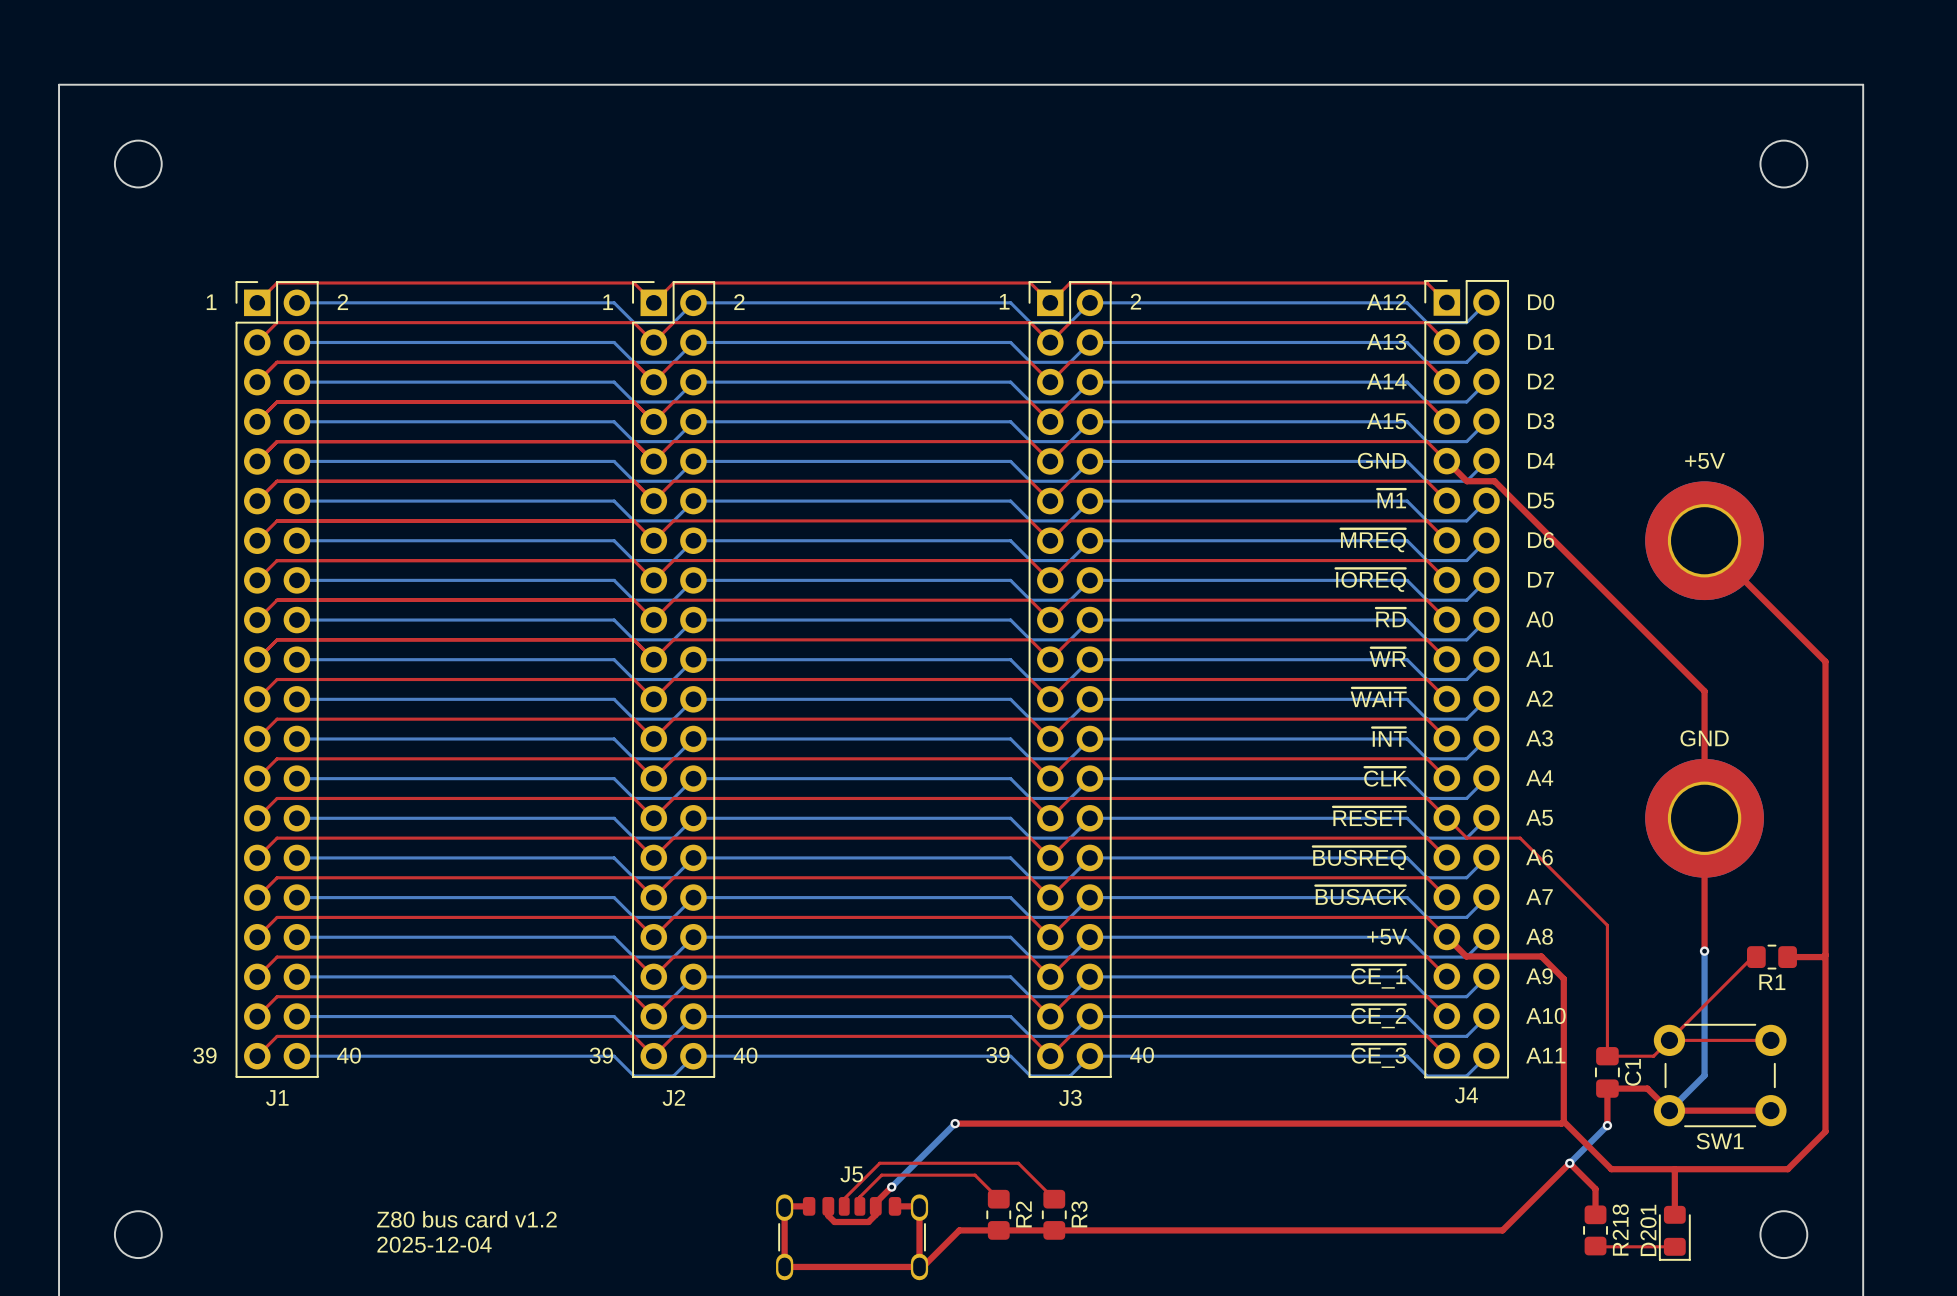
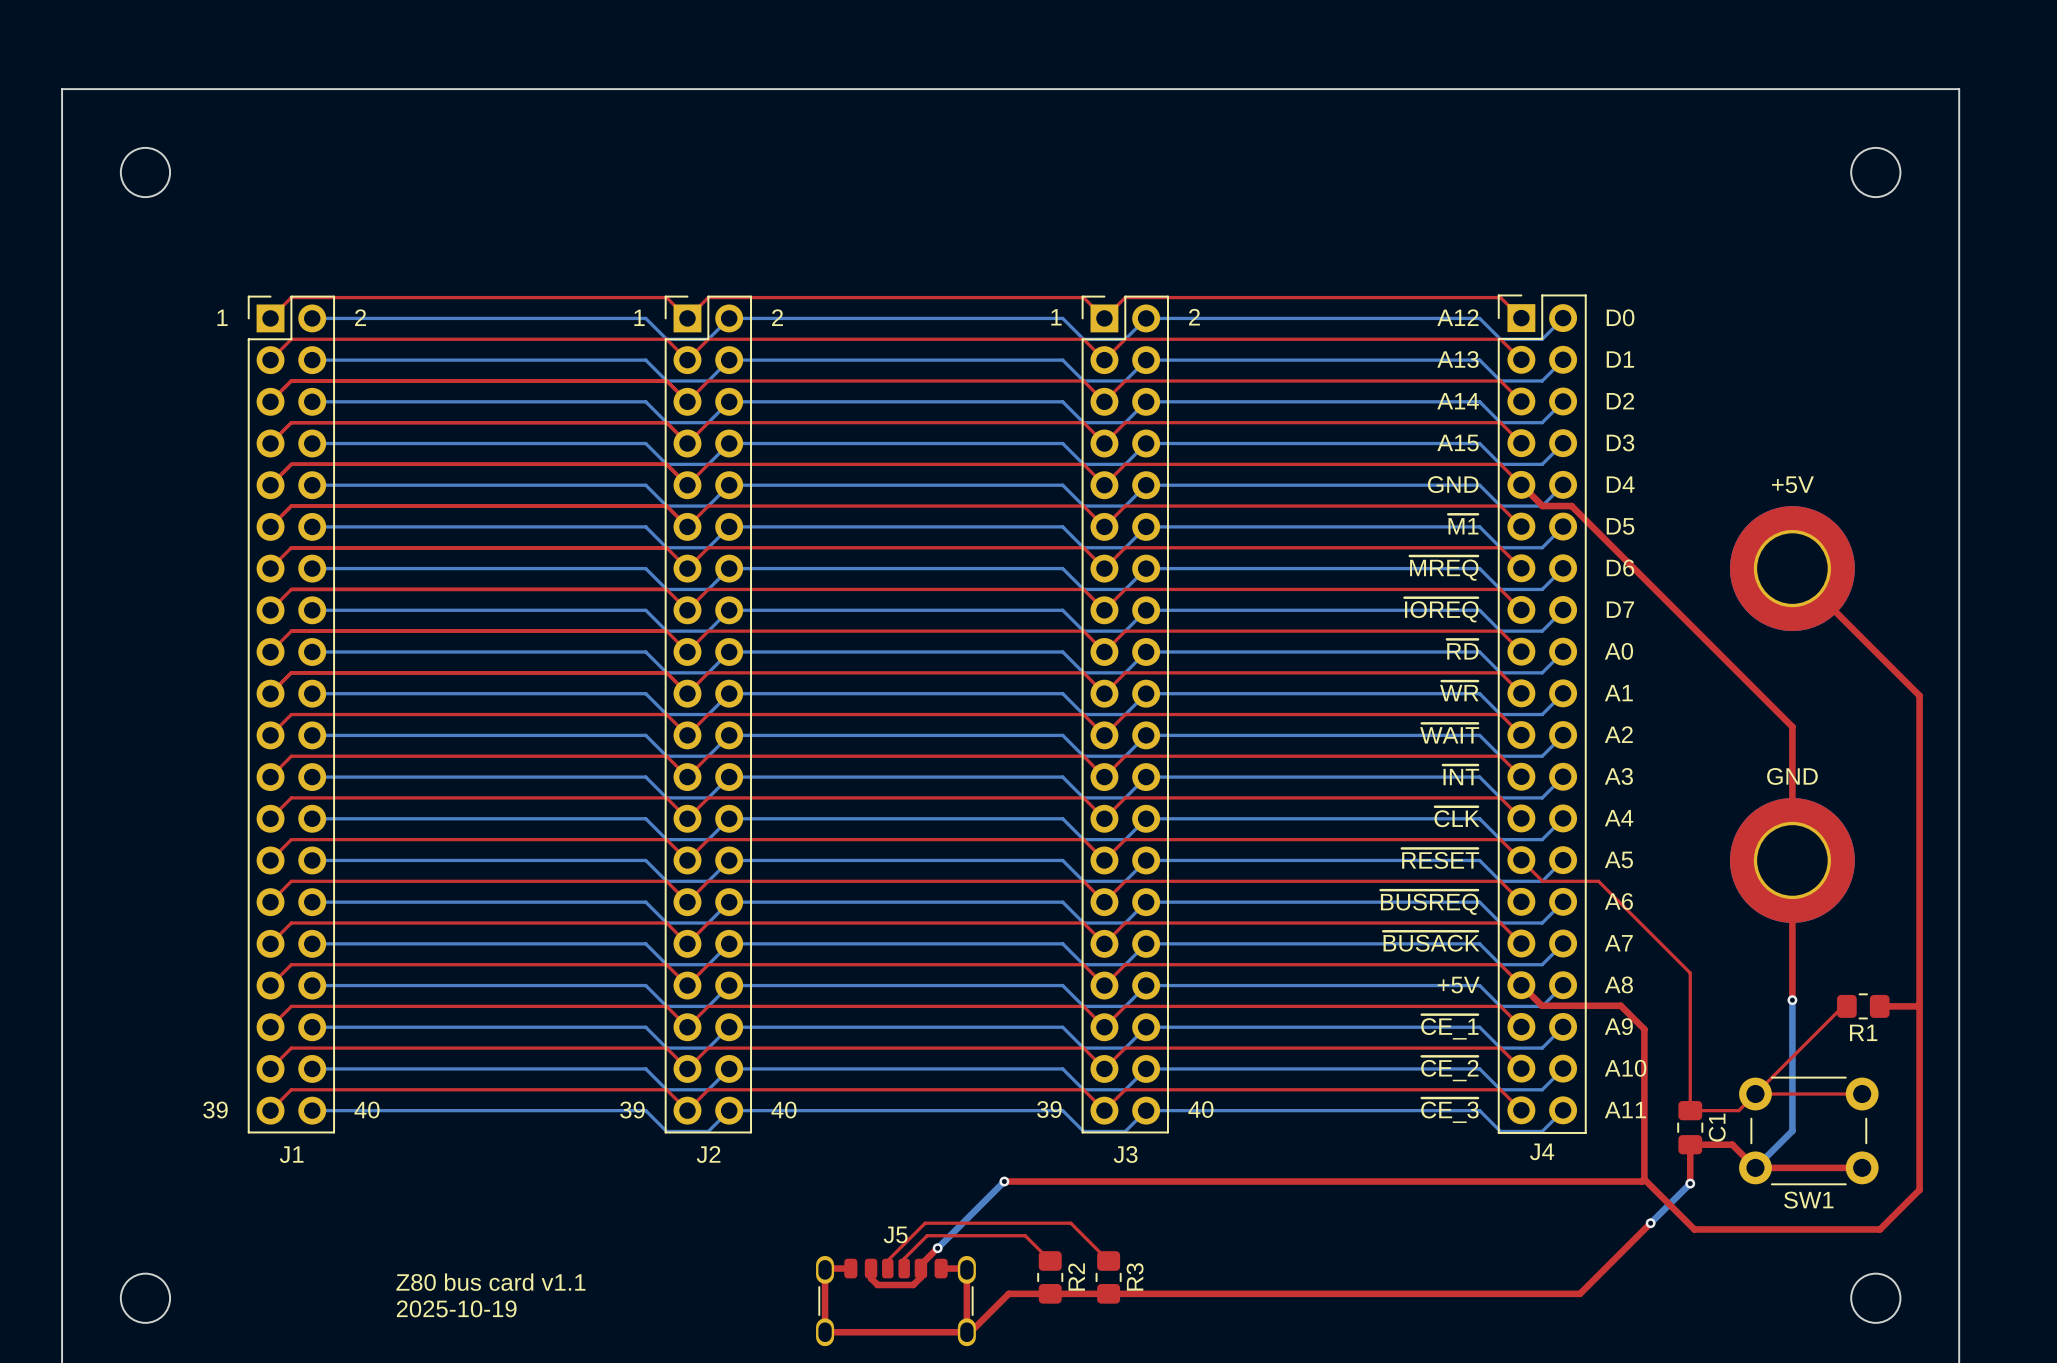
top track: (1569, 1163) (1595, 1189) (1595, 1214) -> none
top track: (1674, 1169) (1674, 1214) -> none
text: Z80 bus card v1.2 (466, 1219) -> Z80 bus card v1.1 (490, 1282)
R218: (1595, 1230) -> none
D201: (1674, 1233) -> none
text: 2025-12-04 (434, 1244) -> 2025-10-19 (456, 1308)
top track: (1595, 1246) (1674, 1246) -> none

